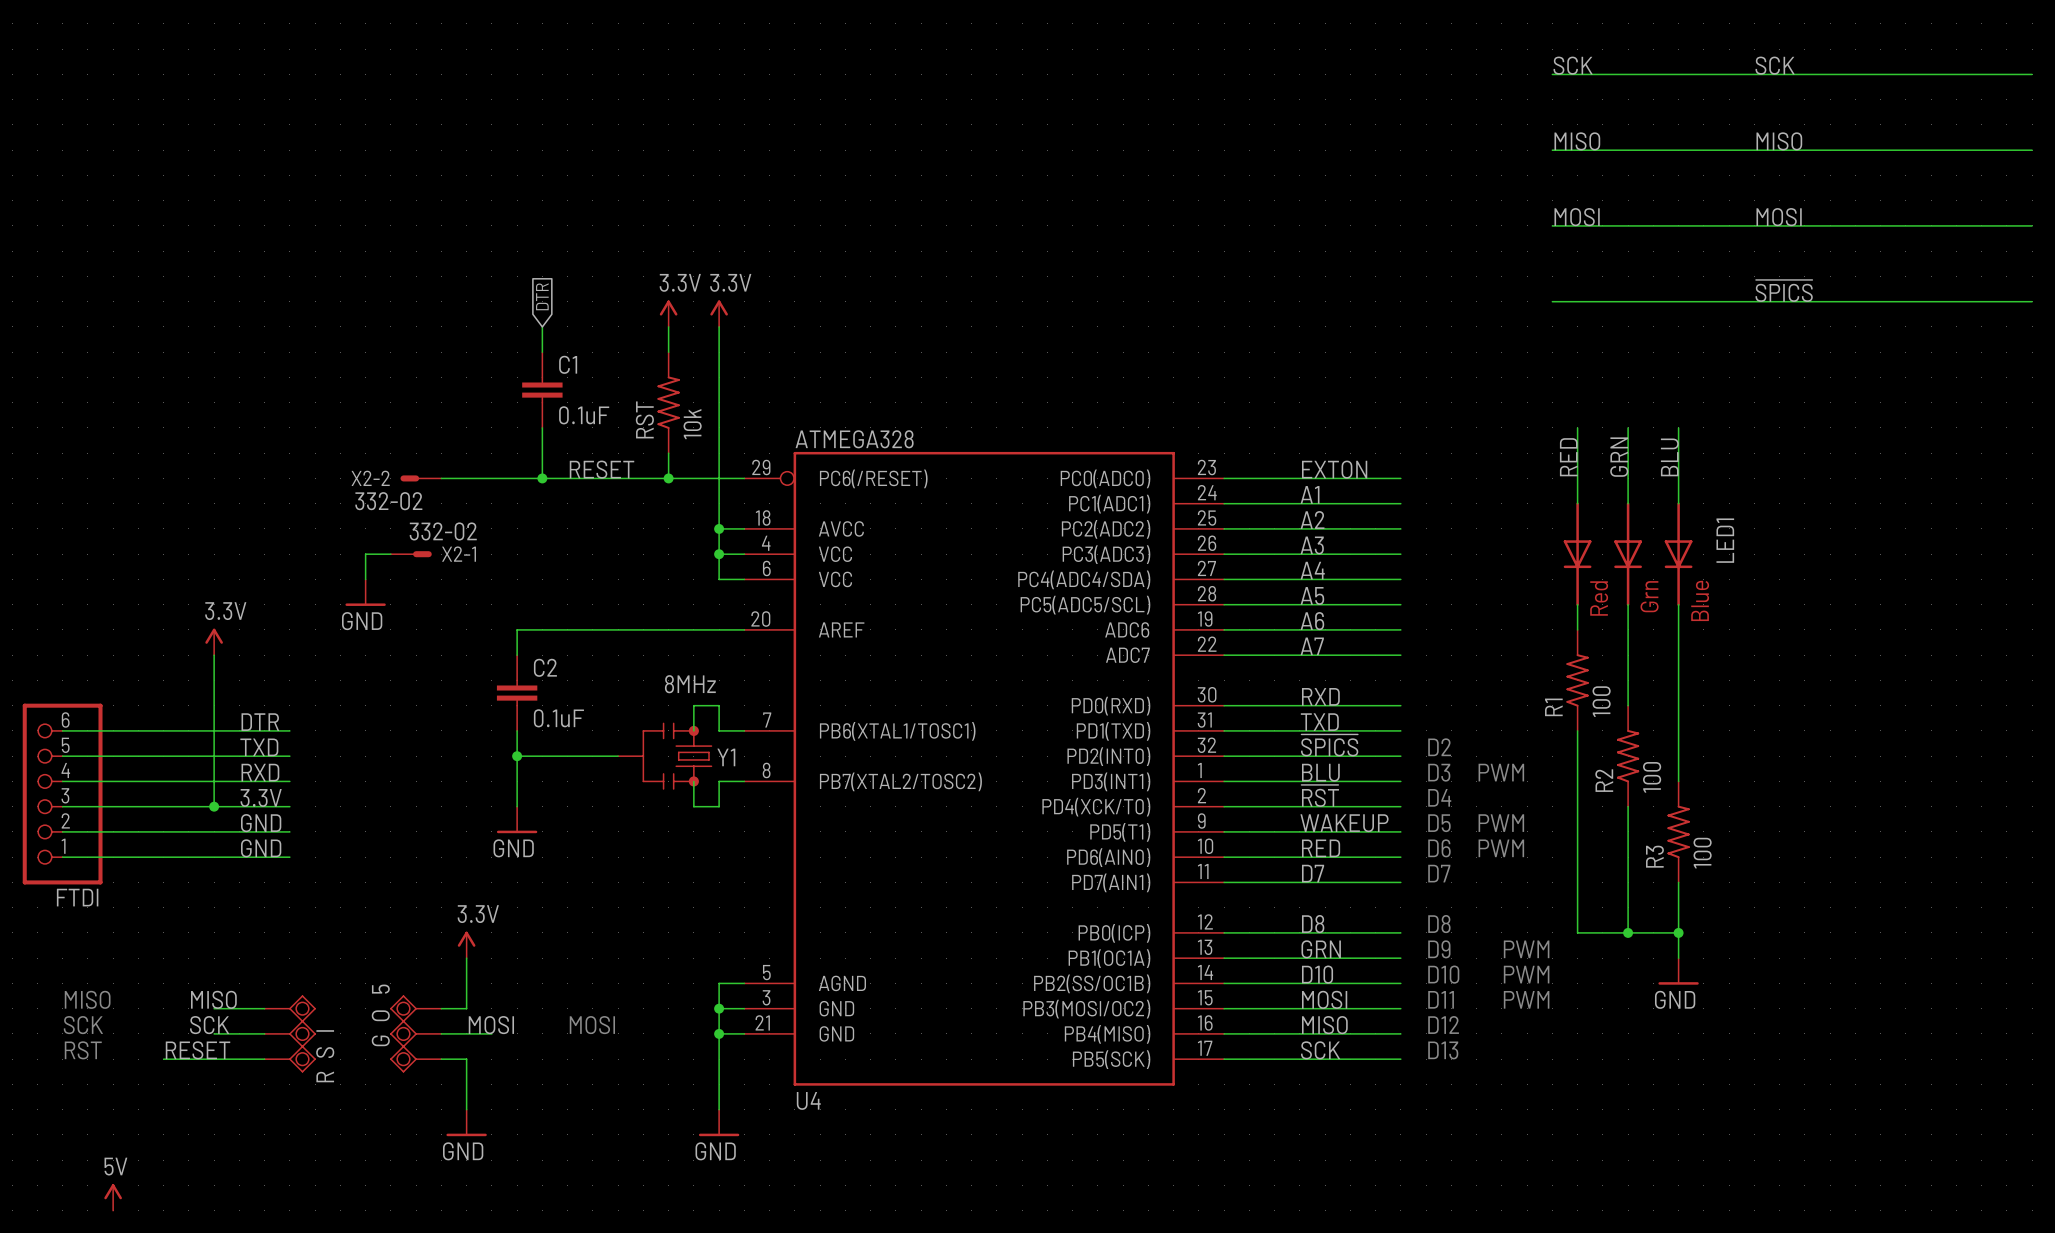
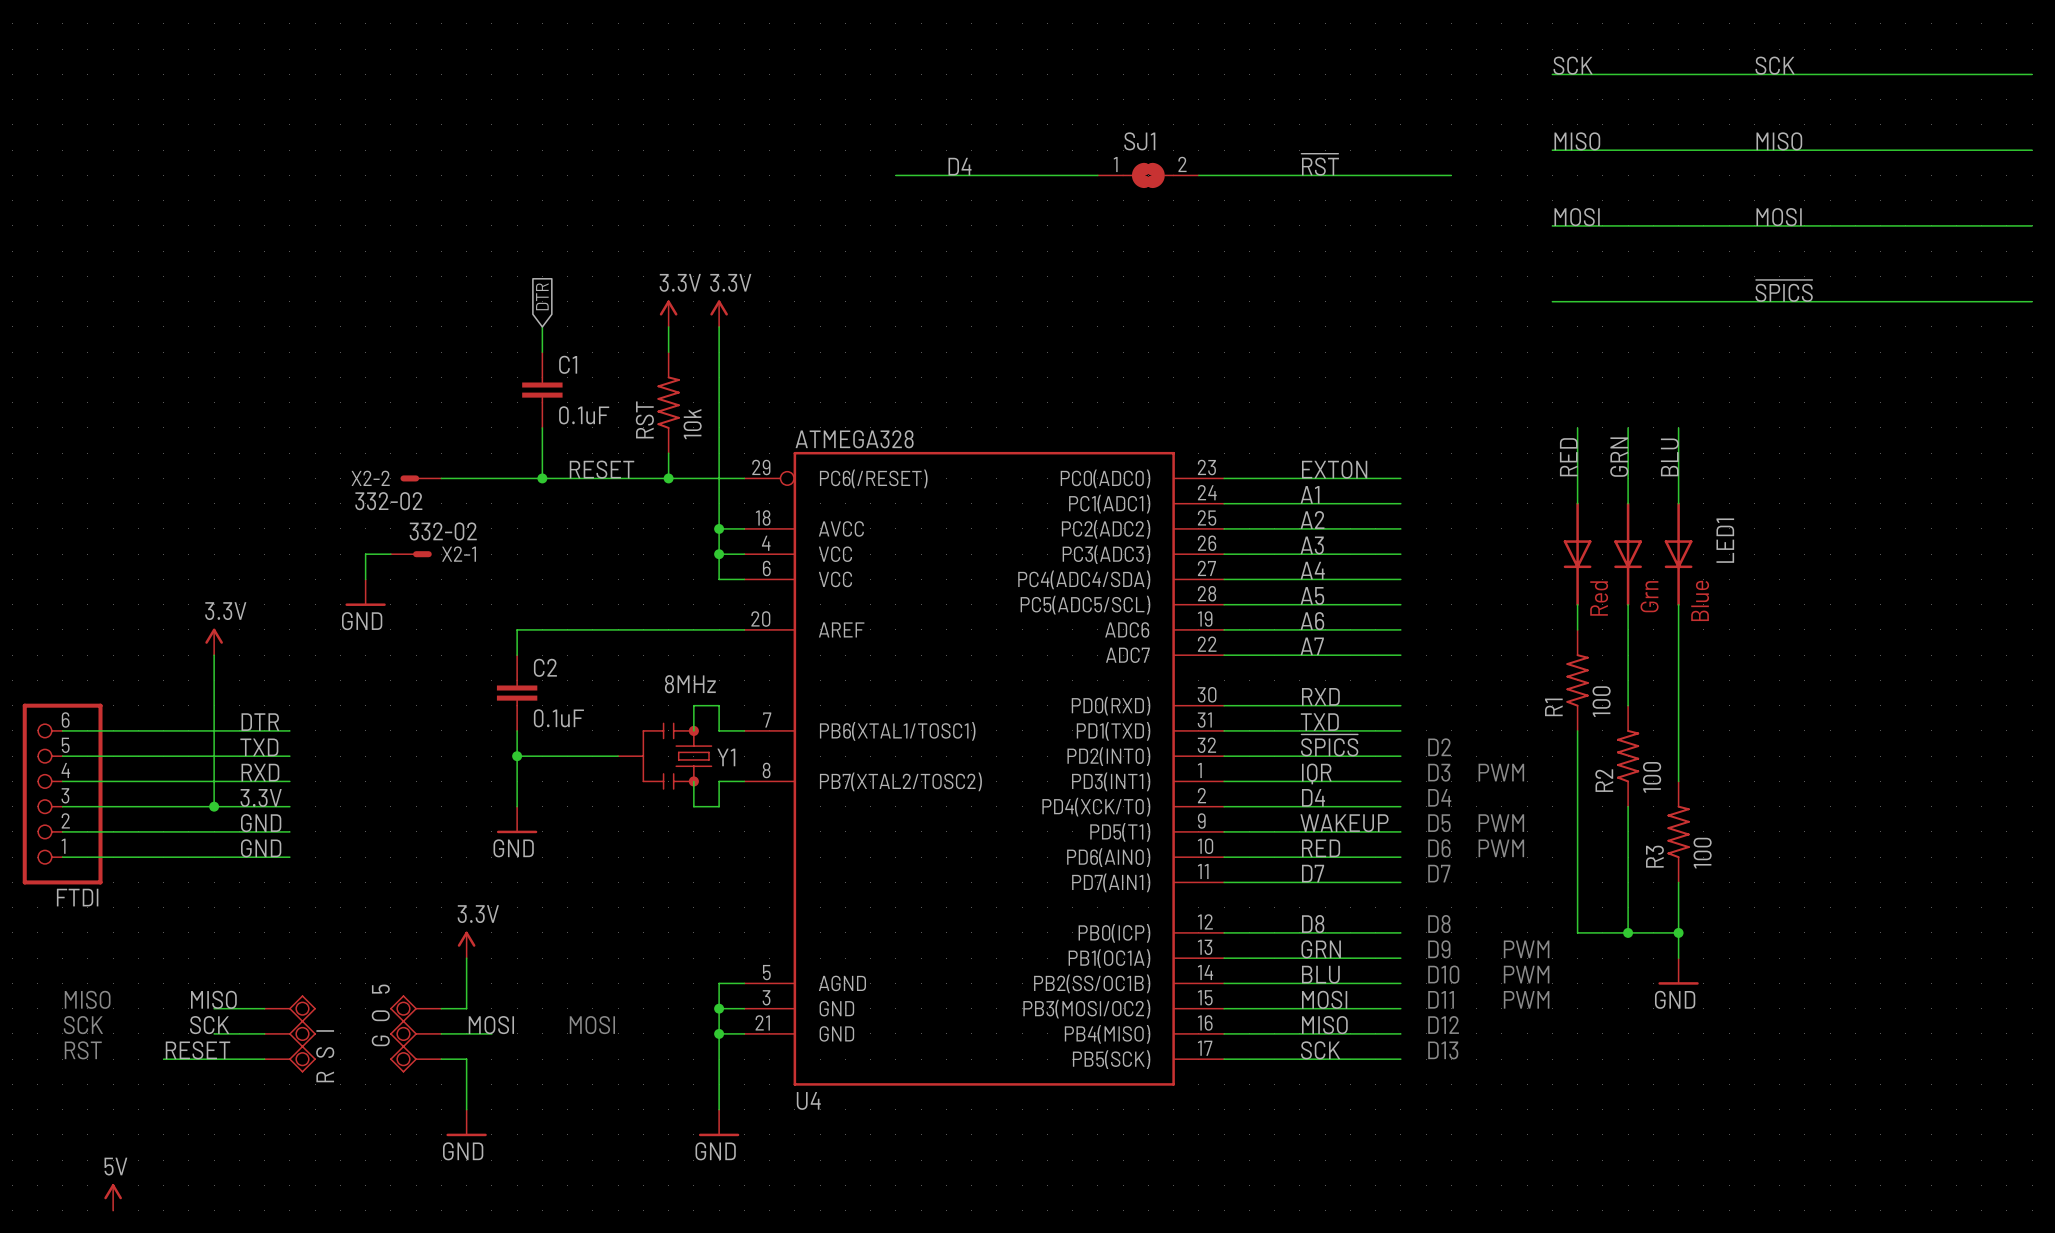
label: none -> ~{RST} (1320, 164)
label: none -> D4 (960, 166)
wire: none -> (895, 175) (1097, 175)
SJ1: none -> (1148, 175)
wire: none -> (1198, 175) (1451, 175)
label: BLU (1320, 772) -> IQR (1316, 773)
label: ~{RST} (1320, 795) -> D4 (1313, 797)
label: D10 (1317, 974) -> BLU (1320, 974)

